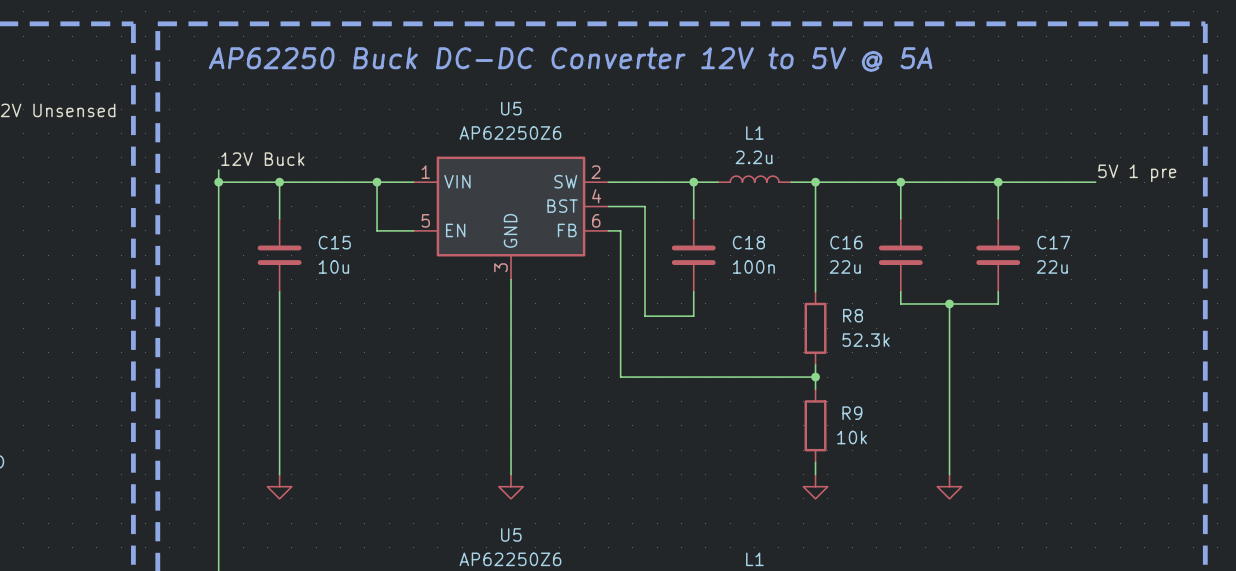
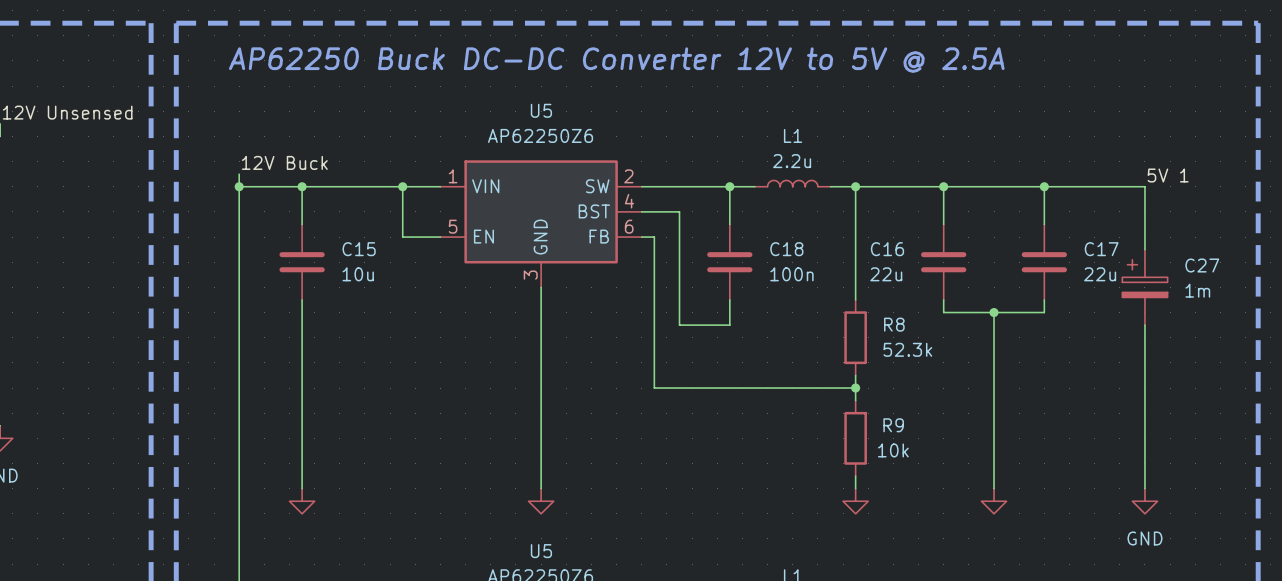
text: AP62250 Buck DC-DC Converter 12V to 5V @ 5A (570, 59) -> AP62250 Buck DC-DC Converter 12V to 5V @ 2.5A (616, 60)
label: 5V 1 pre (1137, 173) -> 5V 1 (1168, 175)
wire: none -> (1144, 186) (1144, 249)
C27: none -> 1m (1144, 287)
wire: none -> (1144, 325) (1144, 488)
power symbol: none -> GND (1144, 501)

